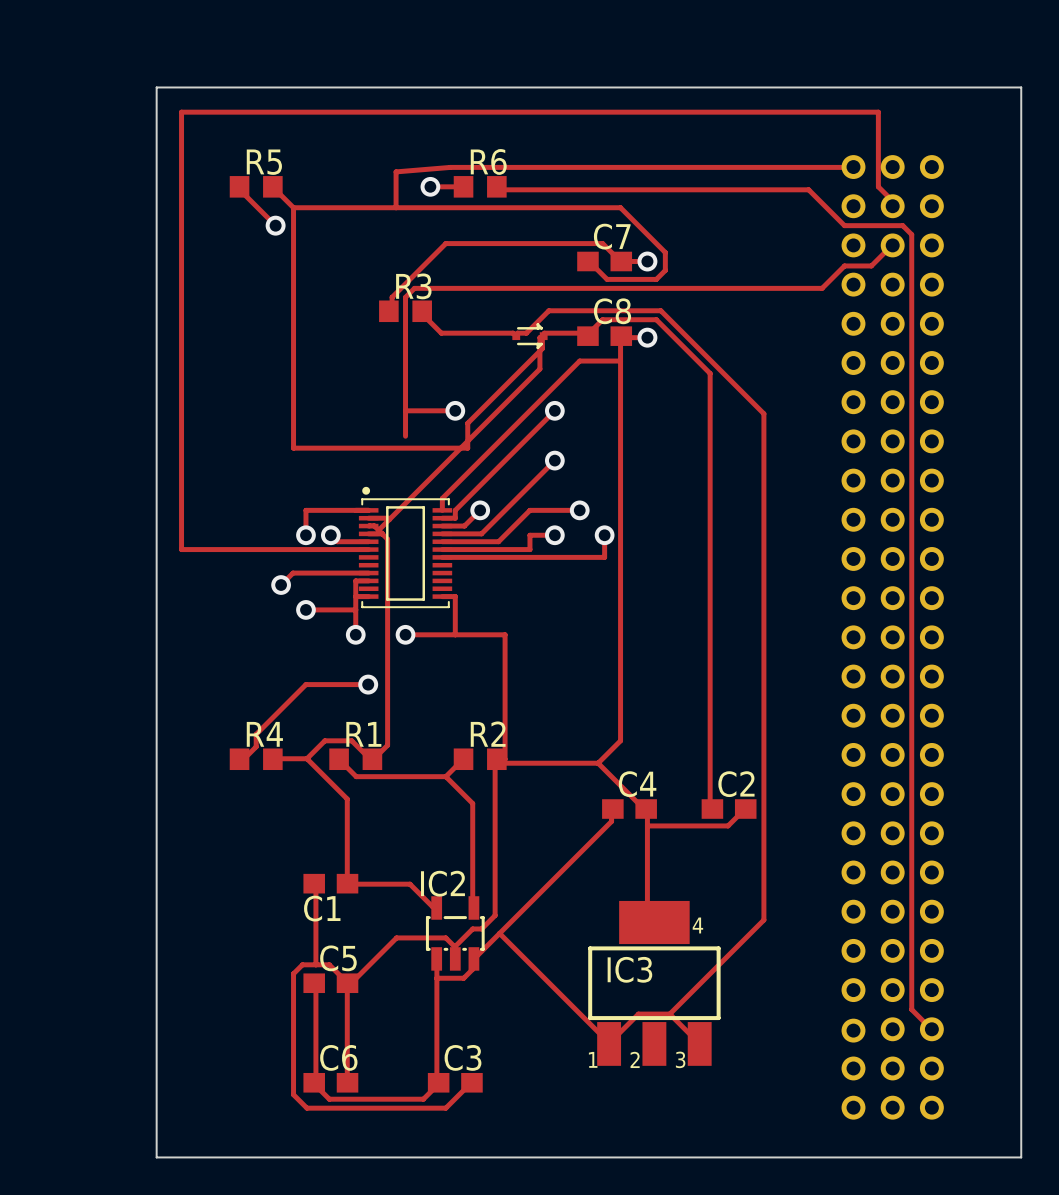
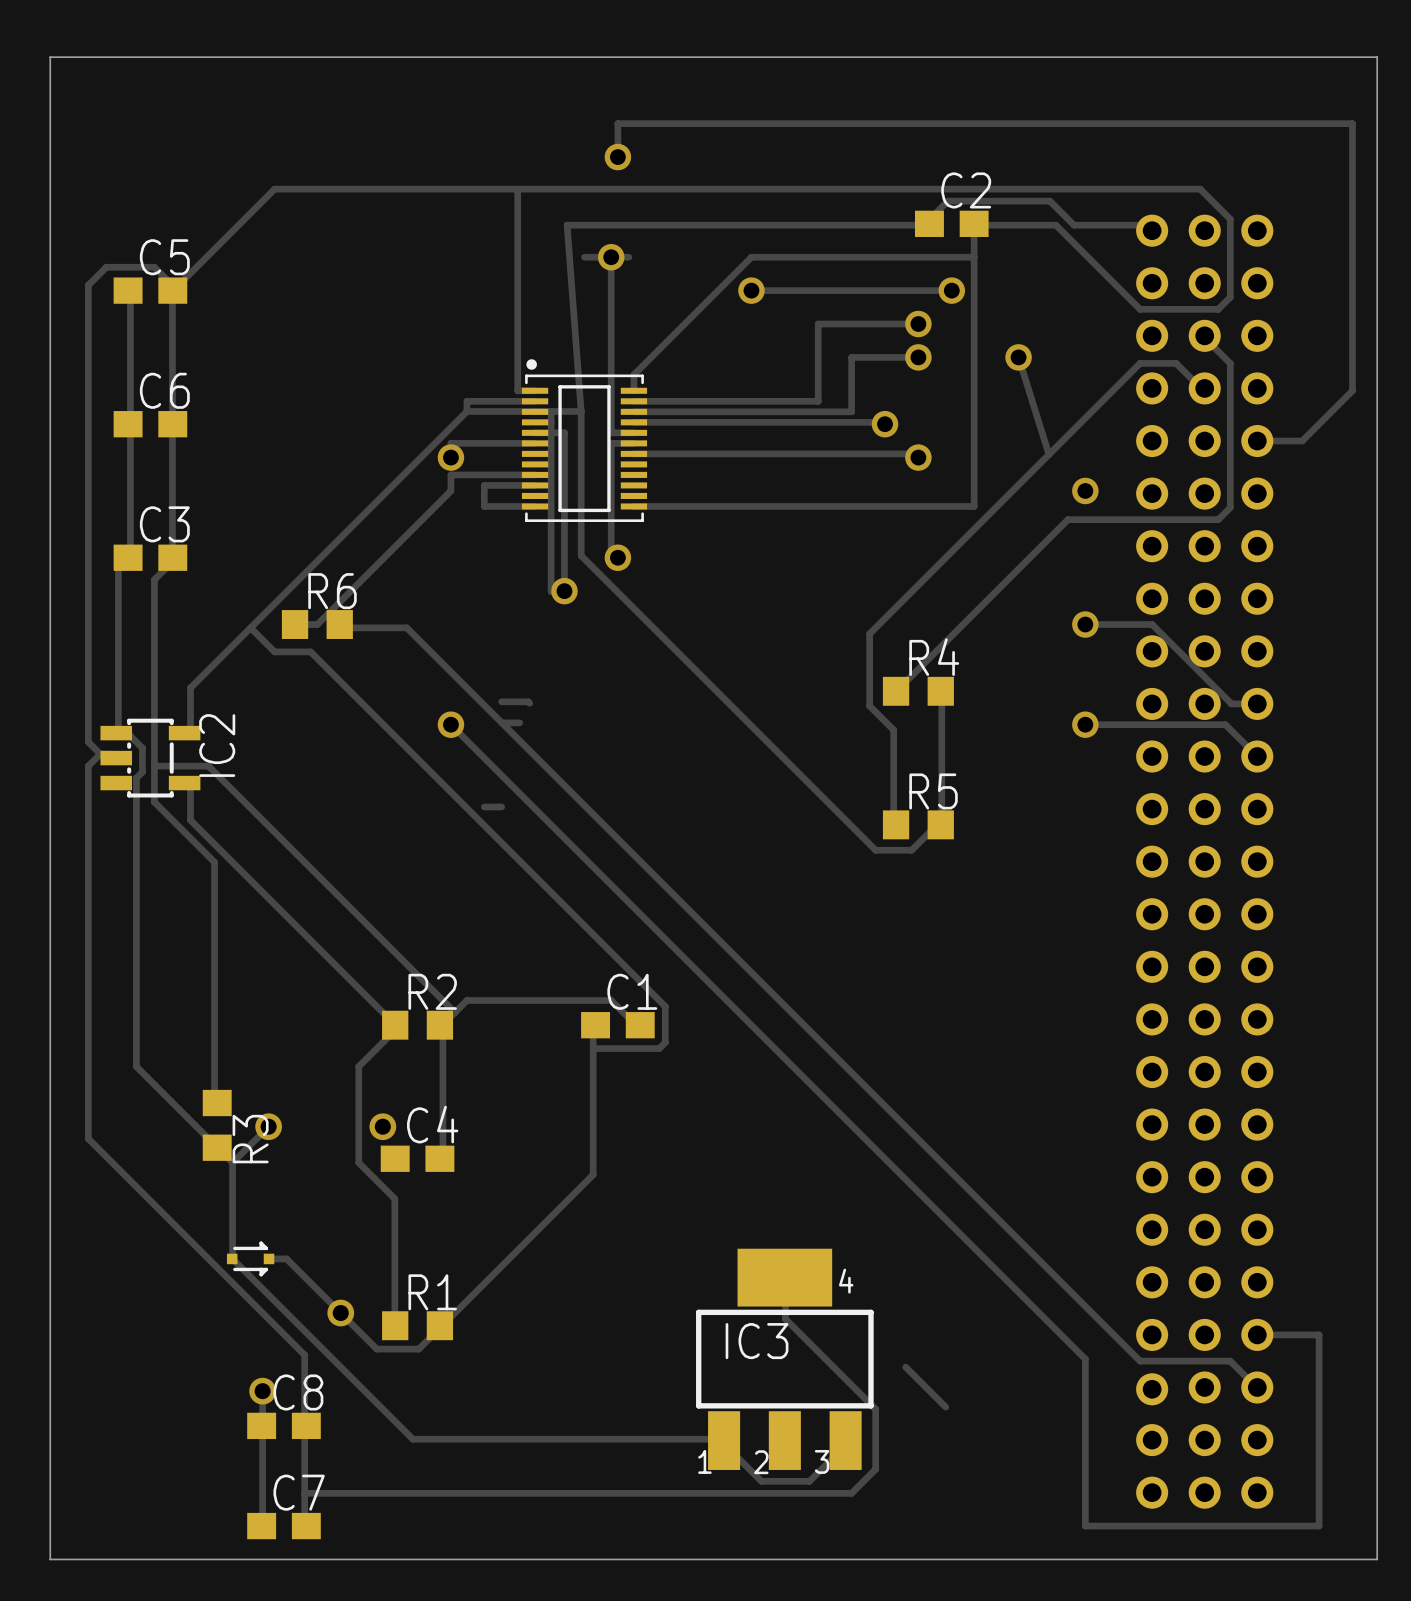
board edge: (1021, 87) (156, 87) (156, 1157) -> (1377, 123) (1377, 57) (50, 57) (50, 1559) (217, 1559)
track: none -> (617, 157) (617, 123) (1352, 123) (1352, 390) (1302, 441) (1257, 441)
via: none -> (617, 157)
track: none -> (517, 189) (517, 390) (535, 390)
track: (853, 167) (450, 167) (396, 171) (396, 207) -> (1152, 230) (1152, 225) (1074, 225) (1049, 201) (947, 201) (929, 219) (929, 223) (923, 225) (567, 225) (581, 411)
track: (239, 186) (239, 189) (275, 225) -> none
R5 position: (256, 186) -> (918, 824)
track: (272, 186) (293, 207) -> none
via position: (430, 186) -> (611, 257)
track: none -> (611, 257) (611, 432) (633, 432)
R6 position: (480, 186) -> (317, 624)
track: (496, 186) (499, 189) (808, 189) -> (633, 506) (974, 506) (974, 223) (1055, 225) (1092, 261)
track: none -> (974, 257) (751, 257) (633, 374) (633, 390)
track: (892, 206) (892, 201) (878, 186) (878, 112) (181, 112) (181, 549) (368, 549) -> none
track: (293, 207) (620, 207) (665, 252) (665, 270) (656, 279) (607, 279) (587, 261) -> none
track: (293, 207) (293, 448) (467, 448) (467, 423) (542, 348) (543, 336) -> none
track: none -> (128, 290) (130, 291) (130, 423) (128, 424) (130, 429) (130, 555) (118, 567) (118, 730) (116, 733) (118, 736) (130, 736) (142, 748) (142, 772) (136, 778) (136, 1066) (232, 1162)
track: none -> (172, 290) (172, 557) (172, 561) (154, 579) (154, 802) (214, 862) (214, 1102) (217, 1103)
track: none -> (172, 290) (274, 189) (1200, 189) (1230, 219) (1230, 297) (1218, 309)
track: none -> (172, 290) (172, 285) (154, 267) (106, 267) (88, 285) (88, 742) (100, 754)
track: none -> (751, 290) (951, 290)
via: none -> (751, 290)
via: none -> (951, 290)
via: (275, 225) -> none
track: (902, 225) (911, 234) (911, 265) -> (1204, 335) (1230, 363)
track: none -> (918, 324) (818, 324) (818, 401) (633, 401)
via: none -> (918, 324)
track: (892, 245) (871, 265) -> (1204, 388) (1200, 387) (1176, 363)
C7 position: (604, 261) -> (283, 1526)
track: (629, 261) (620, 261) (602, 243) (445, 243) (392, 297) (392, 310) (388, 311) -> (851, 357) (851, 411) (633, 411)
track: none -> (875, 357) (918, 357)
via: (647, 261) -> none
via: none -> (918, 357)
track: none -> (1018, 357) (1048, 454)
via: none -> (1018, 357)
track: (822, 288) (414, 288) (405, 297) (405, 301) -> (1110, 393) (869, 633) (869, 705) (893, 730) (893, 820) (896, 824)
track: none -> (535, 401) (466, 401) (466, 411)
track: none -> (466, 411) (581, 411)
track: none -> (466, 411) (190, 687) (190, 730) (184, 733)
track: none -> (581, 411) (581, 555) (875, 850) (911, 850) (935, 826) (940, 824) (940, 691)
track: none -> (633, 422) (885, 422) (885, 424)
R3 rotation: 0° (405, 311) -> 90° clockwise (217, 1125)
R3 position: (405, 311) -> (217, 1125)
track: (422, 311) (423, 315) (441, 333) (513, 333) (516, 336) (517, 333) (526, 333) (548, 310) (660, 310) (763, 413) (763, 920) (669, 1014) (638, 1014) (609, 1043) (499, 933) -> none
via: none -> (885, 424)
track: none -> (535, 432) (564, 432) (564, 591)
track: none -> (535, 443) (450, 443) (450, 457)
track: none -> (633, 453) (914, 453) (918, 457)
via: none -> (450, 457)
part: (529, 336) -> none
track: (543, 336) (544, 333) (584, 333) (587, 336) (602, 319) (656, 319) (710, 373) (710, 808) (712, 809) -> none
track: (543, 336) (539, 337) (539, 369) (378, 530) -> none
C8 position: (604, 336) -> (283, 1425)
via: none -> (918, 457)
track: (647, 337) (620, 337) (620, 740) (598, 763) (499, 763) (496, 759) -> none
via: (647, 337) -> none
track: none -> (535, 474) (450, 474) (450, 490) (317, 624) (295, 624)
track: none -> (535, 485) (484, 485) (484, 506) (535, 506)
track: (620, 361) (579, 361) (442, 498) (442, 510) -> none
via: none -> (1085, 490)
track: (911, 373) (911, 1009) -> (1230, 507) (1218, 519) (1067, 519) (896, 691)
track: (405, 410) (455, 410) -> (633, 443) (611, 443) (611, 551) (617, 557)
track: (554, 410) (455, 510) (455, 518) (442, 518) -> none
via: (554, 410) -> none
via: none -> (564, 591)
track: none -> (339, 624) (340, 627) (406, 627) (809, 1030)
track: (554, 460) (481, 533) (442, 533) -> none
via: (554, 460) -> none
track: none -> (1085, 624) (1152, 624) (1231, 703) (1257, 703)
via: none -> (1085, 624)
track: none -> (250, 627) (274, 651) (310, 651) (665, 1006) (665, 1042) (659, 1048) (605, 1048)
track: (368, 510) (305, 510) (305, 535) -> none
track: (480, 510) (464, 526) (442, 526) -> none
via: (480, 510) -> none
track: (579, 510) (529, 510) (498, 541) (442, 541) -> none
via: (579, 510) -> none
track: (368, 526) (374, 525) (387, 539) (387, 745) (372, 759) (351, 740) -> (640, 1025) (635, 1024) (611, 1000) (478, 1000)
via: (305, 535) -> none
track: (554, 535) (529, 535) (529, 549) (442, 549) -> none
via: (554, 535) -> none
track: (604, 535) (604, 557) (442, 557) -> none
via: (604, 535) -> none
track: none -> (1085, 724) (1225, 724) (1257, 756)
via: none -> (1085, 724)
track: (337, 541) (368, 541) -> (459, 733) (1085, 1359) (1085, 1526) (1319, 1526) (1319, 1334) (1257, 1334)
part position: (405, 547) -> (584, 440)
track: none -> (100, 754) (88, 766) (88, 1138) (304, 1355) (304, 1421) (306, 1425) (304, 1427) (304, 1523) (306, 1526)
track: none -> (154, 766) (208, 766) (454, 1012)
track: (368, 573) (293, 573) (281, 585) -> none
track: none -> (184, 783) (190, 784) (190, 820) (395, 1025) (394, 1030) (358, 1066) (358, 1162) (394, 1198) (395, 1325)
track: (368, 580) (355, 580) (355, 634) -> none
via: (281, 585) -> none
track: (442, 596) (455, 596) (455, 634) -> none
track: (305, 609) (355, 609) -> none
via: (305, 609) -> none
via: (355, 634) -> none
track: (405, 634) (505, 634) (505, 759) (496, 759) -> none
via: (405, 634) -> none
track: (368, 684) (305, 684) (256, 734) (256, 746) (243, 759) (239, 758) -> none
via: (368, 684) -> none
track: (342, 740) (324, 740) (306, 758) -> (466, 1000) (442, 1024) (439, 1025) (442, 1030) (442, 1156) (439, 1158)
track: (306, 758) (275, 758) (272, 759) (271, 763) -> none
track: (306, 758) (347, 799) (347, 883) (410, 884) (432, 906) (436, 907) -> none
R4 position: (256, 759) -> (918, 691)
track: (339, 759) (356, 776) (436, 776) -> none
R1 position: (355, 759) -> (417, 1325)
track: none -> (595, 1025) (593, 1030) (593, 1174) (442, 1325) (439, 1325) (418, 1349) (376, 1349) (286, 1258) (268, 1258)
track: (463, 759) (445, 776) (472, 803) (473, 907) -> none
R2 position: (480, 759) -> (417, 1025)
track: (496, 759) (495, 763) (495, 915) (481, 928) (472, 928) (454, 946) -> none
track: (642, 808) (646, 809) (647, 812) (647, 915) (654, 922) -> (869, 1090) (1140, 1361) (1230, 1361)
track: (612, 809) (611, 821) (473, 958) (472, 969) (463, 978) (436, 978) -> none
C4 position: (629, 809) -> (417, 1158)
C2 position: (729, 809) -> (951, 223)
track: (745, 809) (728, 825) (647, 825) -> none
track: none -> (268, 1126) (232, 1162)
via: none -> (268, 1126)
via: none -> (382, 1126)
track: none -> (232, 1162) (232, 1258) (412, 1439) (719, 1439) (724, 1440) (725, 1445) (761, 1481) (809, 1481) (845, 1445) (845, 1440)
track: (314, 883) (315, 884) (315, 964) -> none
C1 position: (330, 883) -> (617, 1025)
C1 name position: C1 (322, 908) -> C1 (632, 991)
part: none -> (250, 1258)
IC2 rotation: 0° (455, 933) -> 90° clockwise (150, 758)
IC2 position: (455, 933) -> (150, 758)
track: (454, 946) (445, 937) (396, 937) (351, 982) (347, 983) -> none
track: (436, 958) (436, 1081) (438, 1082) (423, 1099) (329, 1099) (315, 1085) (314, 1082) (315, 1081) (315, 987) (314, 983) -> none
via: none -> (340, 1313)
C5 position: (330, 983) -> (150, 290)
track: (347, 983) (329, 964) (302, 964) (293, 973) (293, 1094) (306, 1108) -> (304, 1493) (418, 1493)
track: (347, 983) (347, 1082) -> none
IC3 position: (654, 983) -> (784, 1359)
track: none -> (262, 1391) (261, 1526)
via: none -> (262, 1391)
C6 position: (330, 1082) -> (150, 424)
C3 position: (455, 1082) -> (150, 557)
track: (471, 1082) (445, 1108) -> (784, 1277) (785, 1319) (875, 1409) (875, 1469) (851, 1493) (605, 1493)

